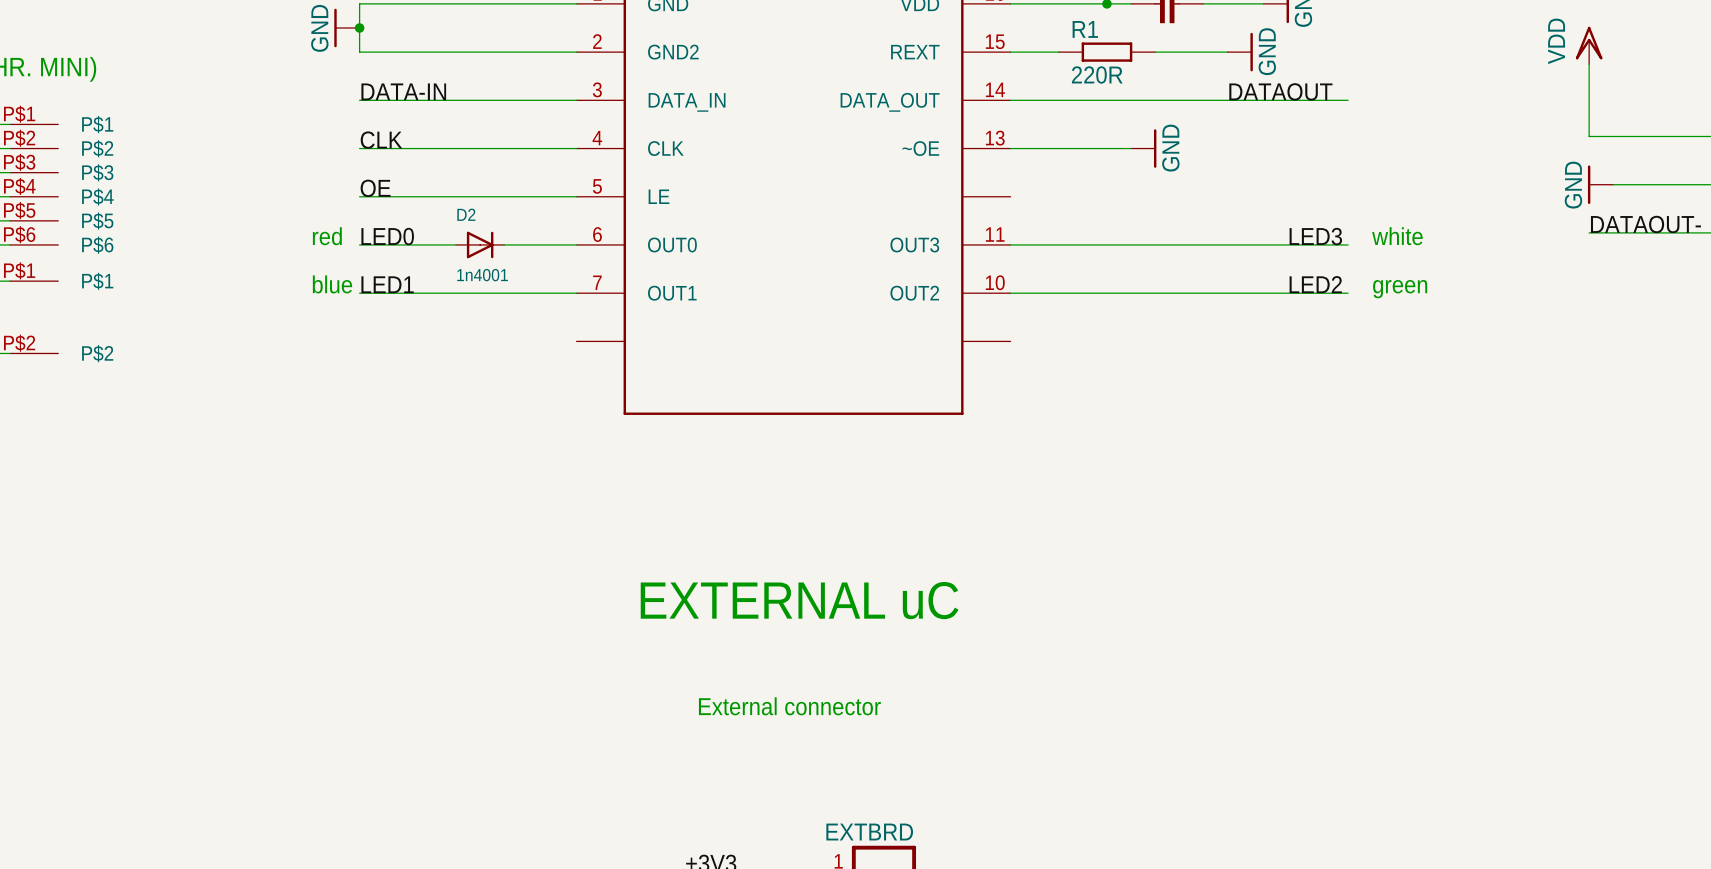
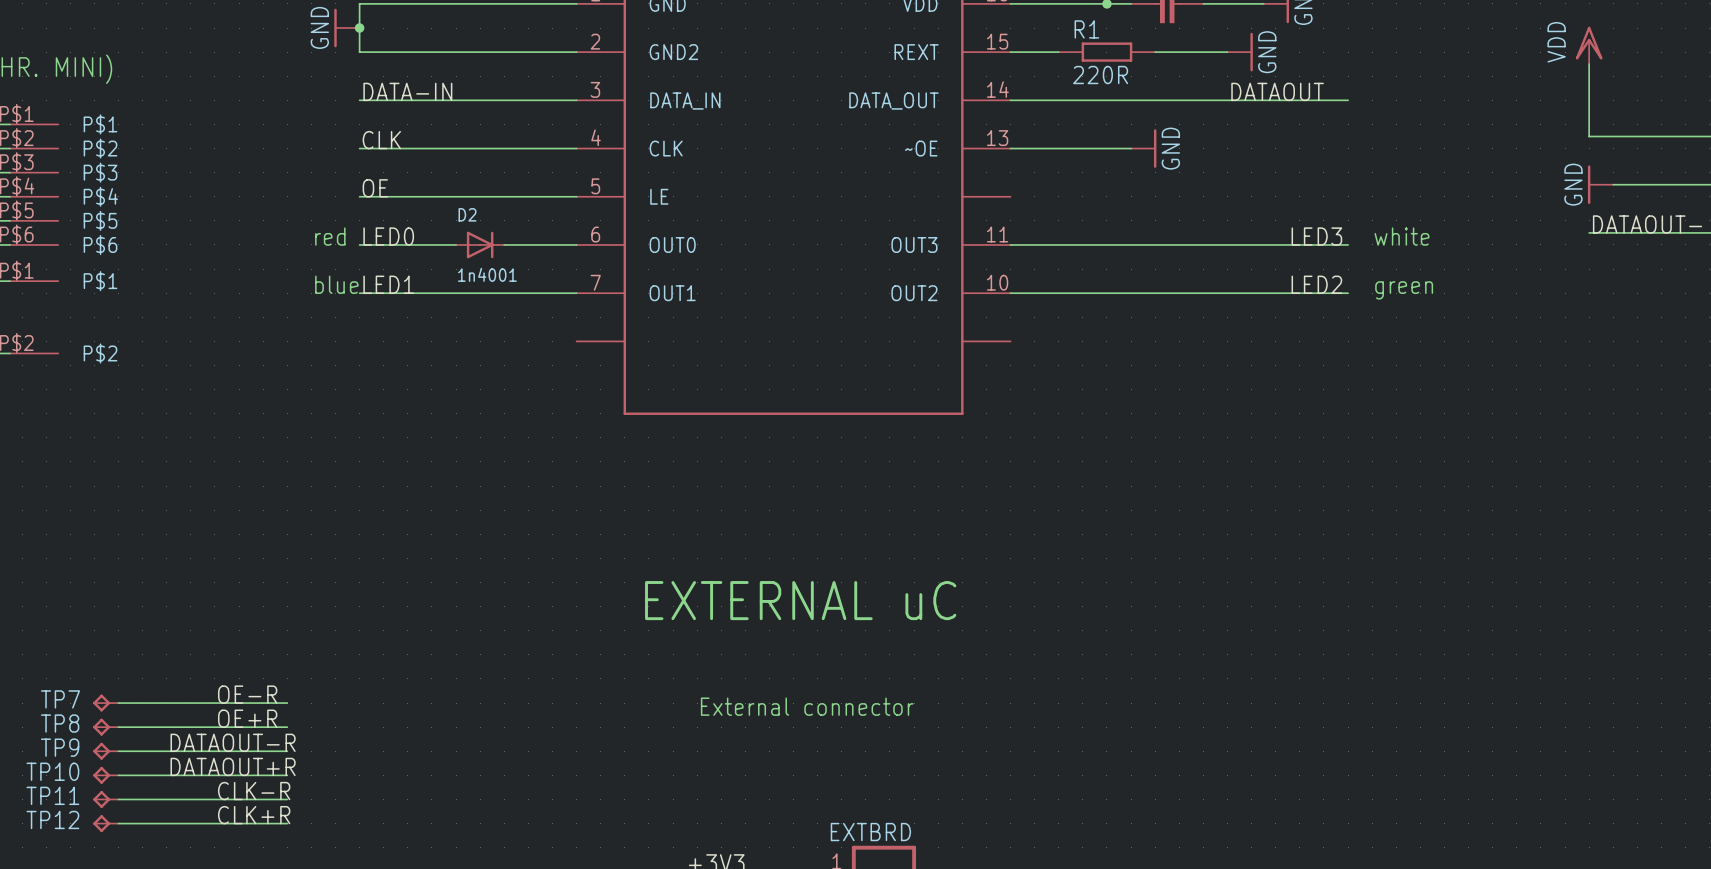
label: none -> OE-R (247, 694)
TP7: none -> (105, 703)
wire: none -> (118, 703) (287, 703)
label: none -> OE+R (247, 718)
TP8: none -> (105, 727)
wire: none -> (118, 727) (287, 727)
label: none -> DATAOUT-R (233, 742)
TP9: none -> (105, 751)
wire: none -> (118, 751) (287, 751)
label: none -> DATAOUT+R (233, 766)
TP10: none -> (105, 775)
wire: none -> (118, 775) (287, 775)
label: none -> CLK-R (254, 791)
TP11: none -> (105, 799)
wire: none -> (118, 799) (287, 799)
label: none -> CLK+R (254, 815)
TP12: none -> (105, 823)
wire: none -> (118, 823) (287, 823)

